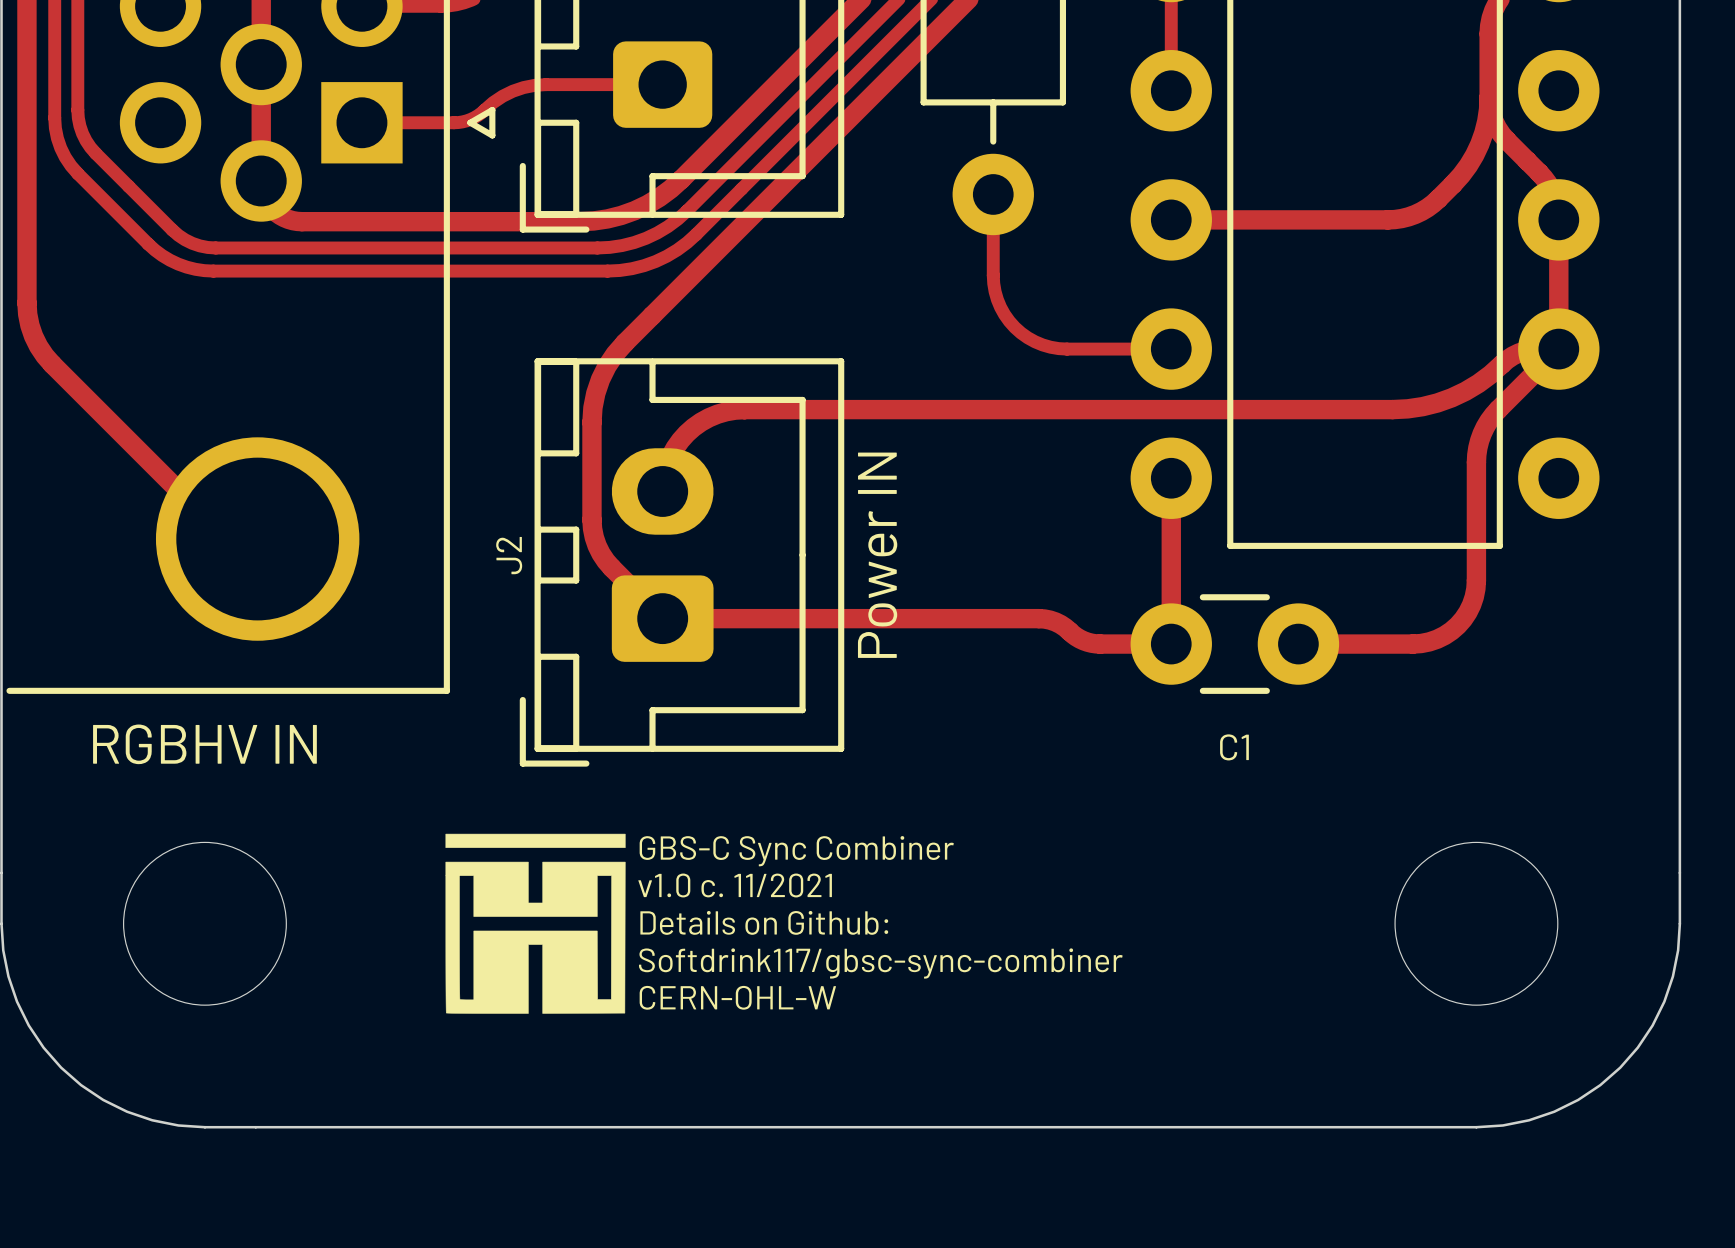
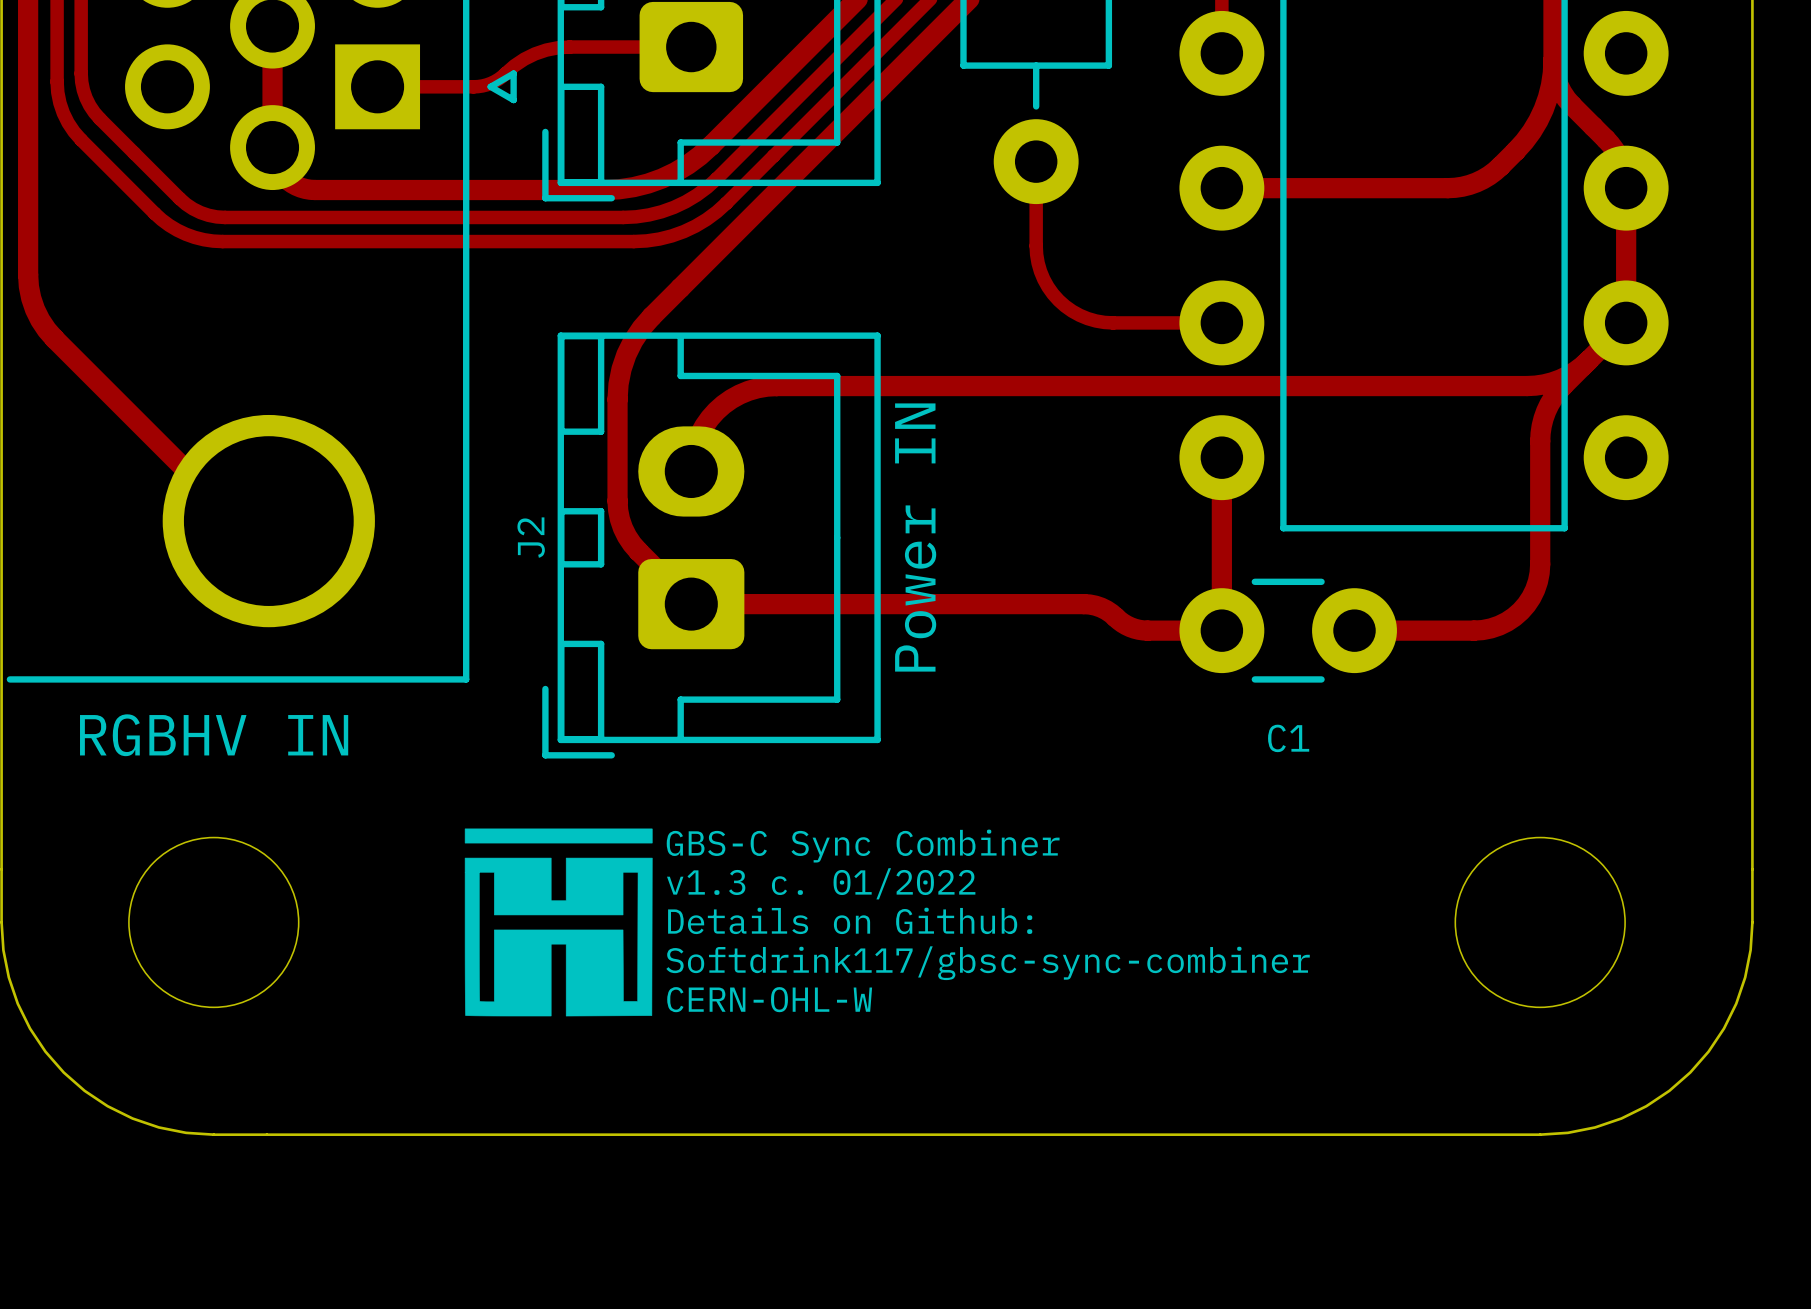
track: (1538, 349) (1525, 350) (1512, 356) (1478, 383) (1451, 397) (1422, 406) (1392, 409) -> (1588, 360) (1567, 375) (1543, 384) (1452, 386)
text: v1.0 c. 11/2021 (735, 885) -> v1.3 c. 01/2022 (821, 883)

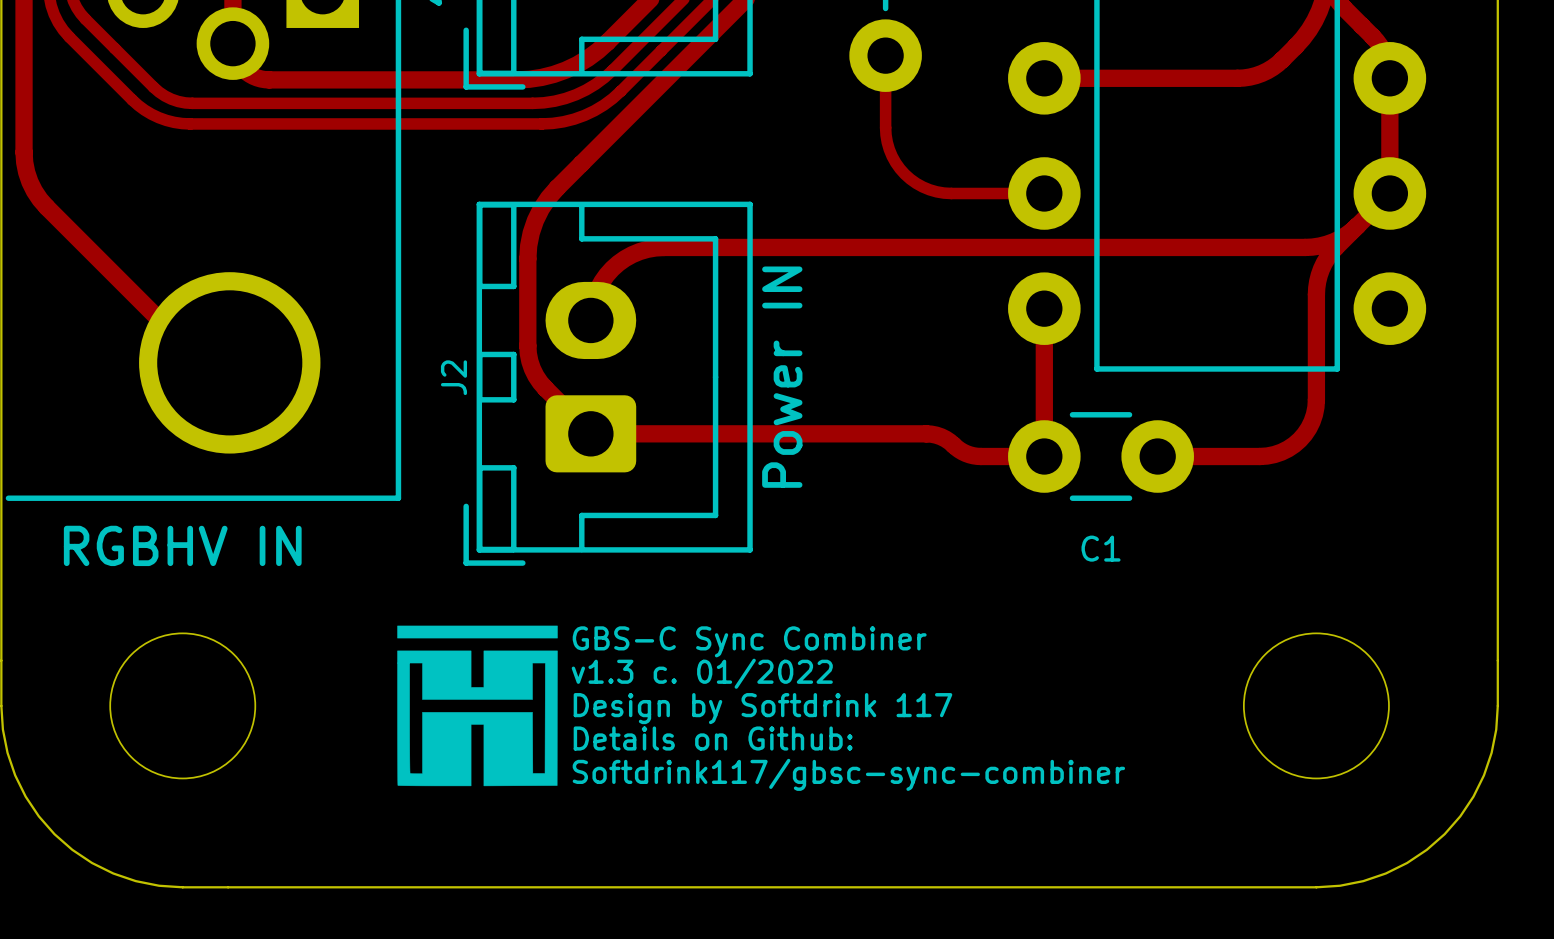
text position: Details on Github: (850, 920) -> Details on Github: (713, 738)
text: none -> Design by Softdrink 117 (762, 708)
text position: Softdrink117/gbsc-sync-combiner (988, 963) -> Softdrink117/gbsc-sync-combiner (848, 774)
text: CERN-OHL-W (769, 999) -> none

